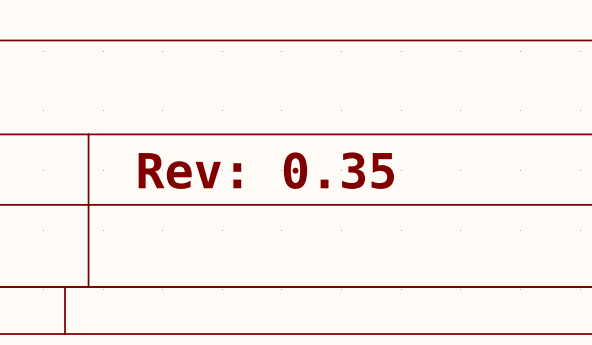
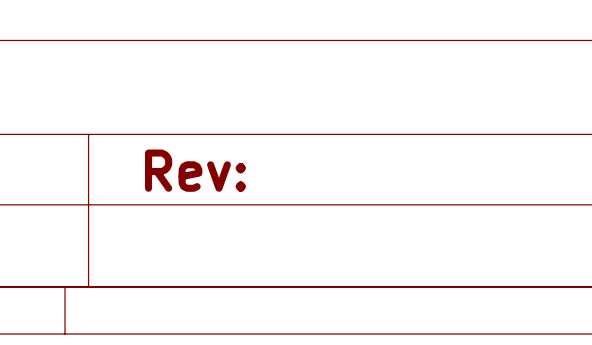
title block: Rev: 0.35 (266, 170) -> Rev: (195, 170)

